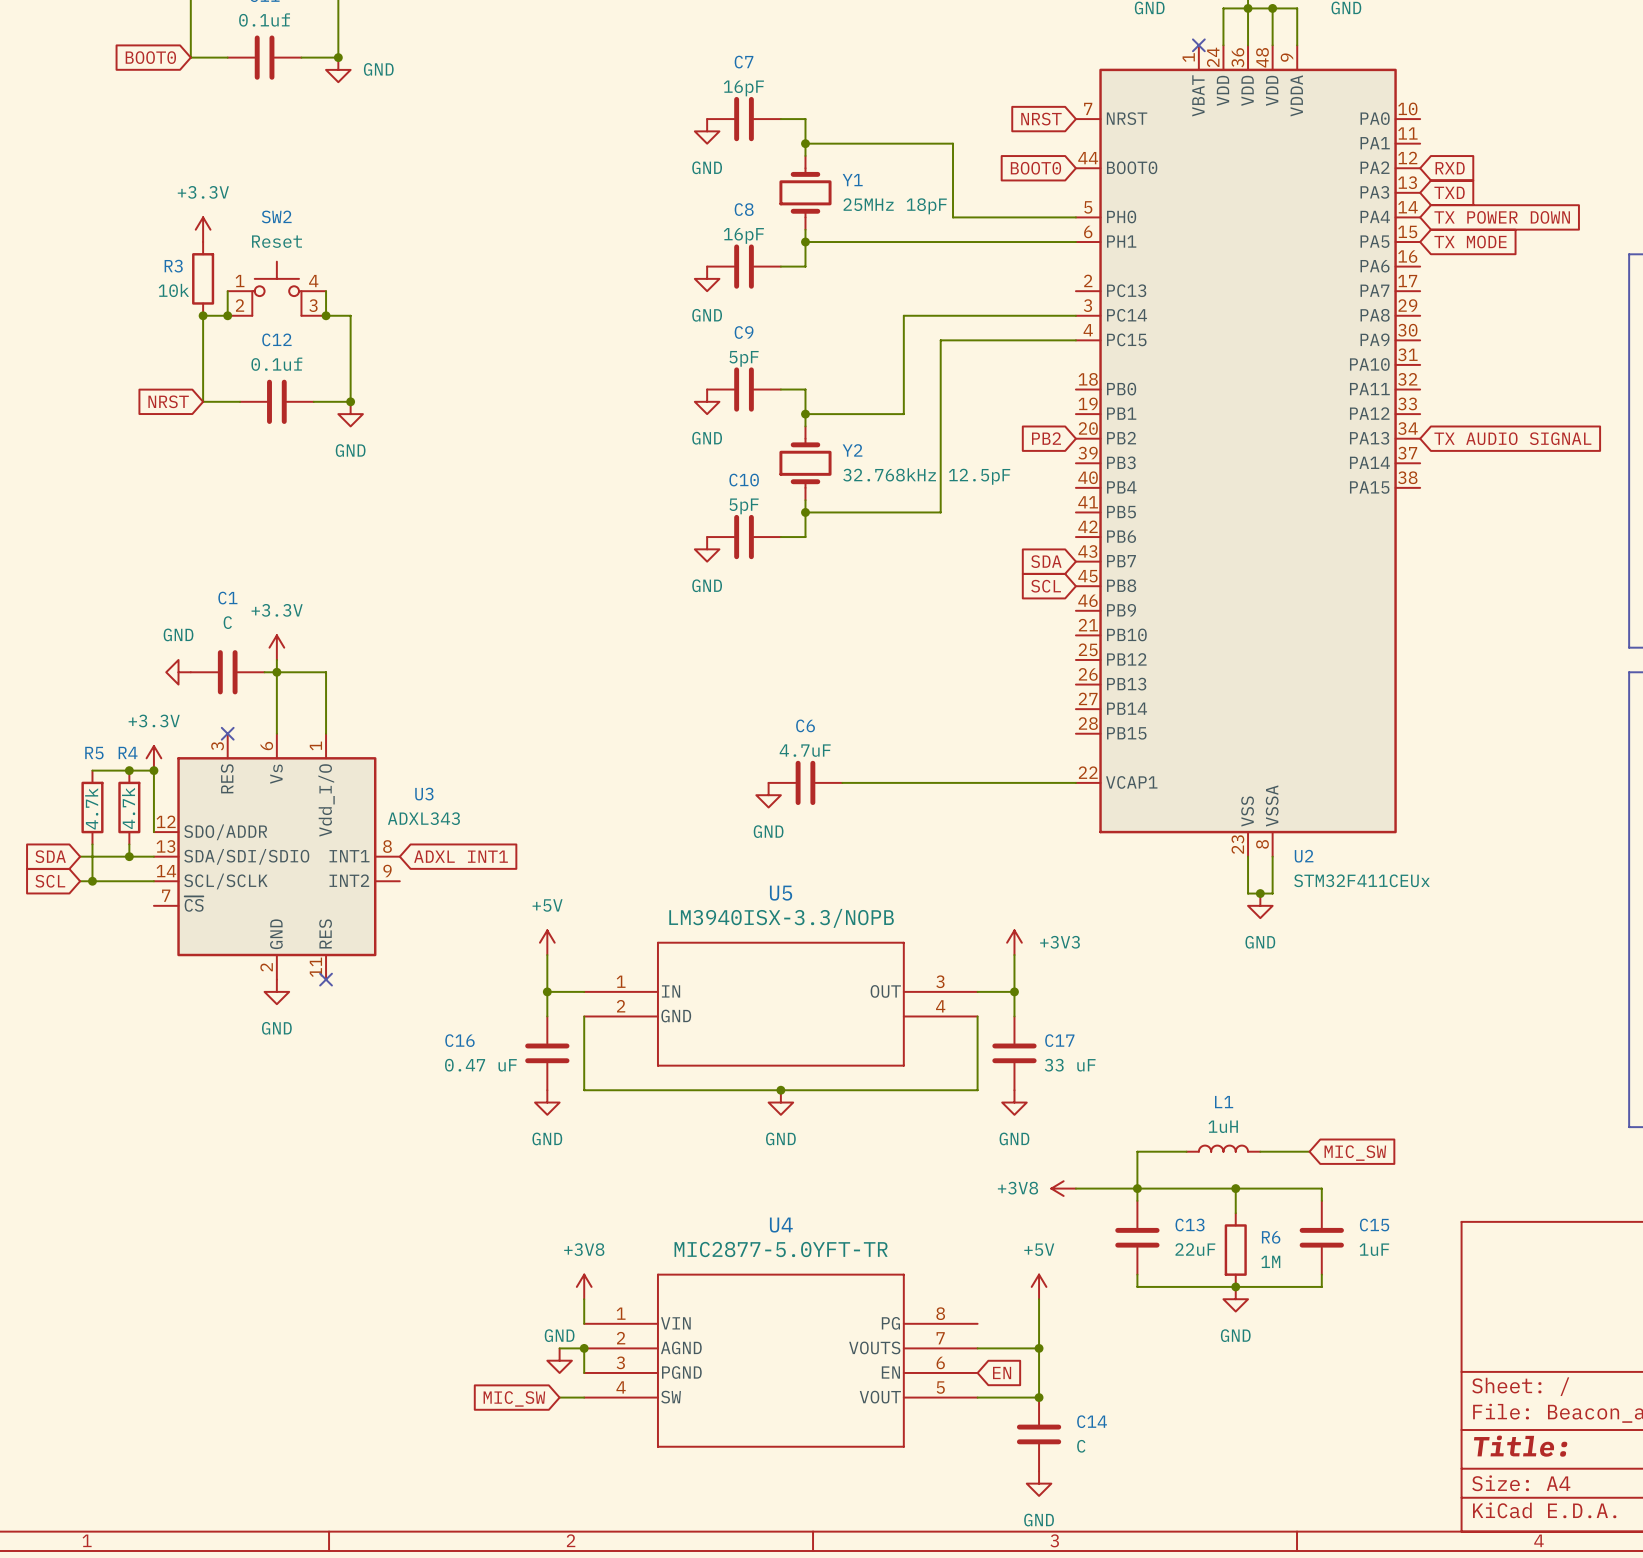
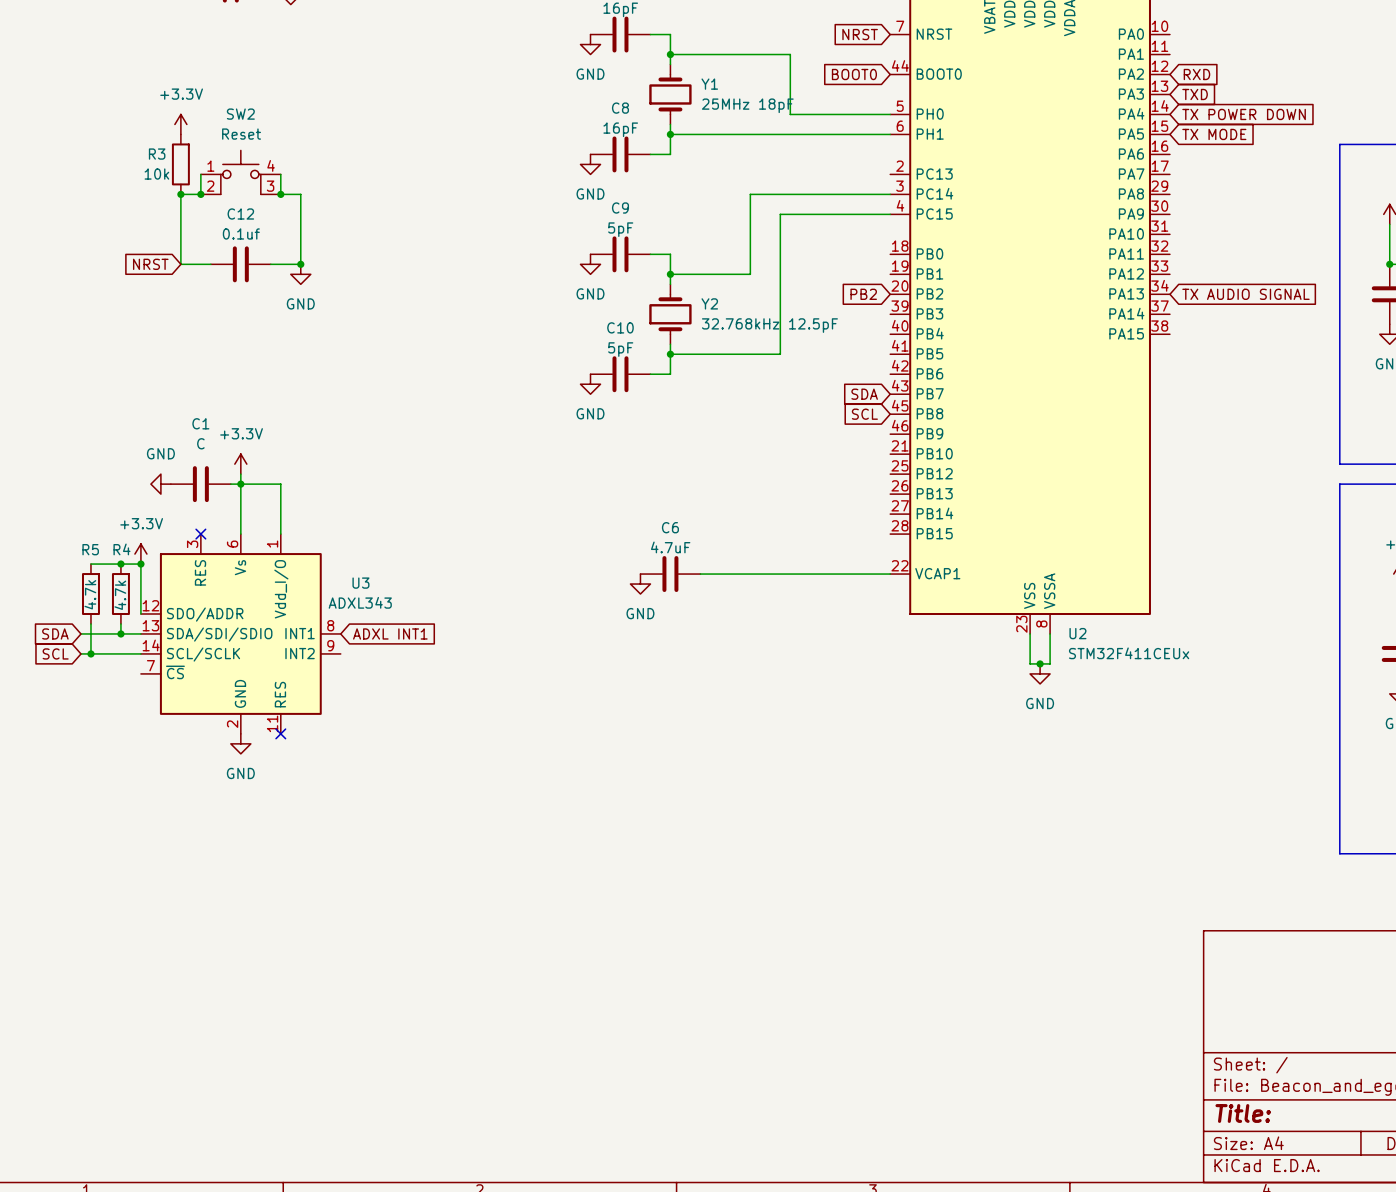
power symbol: +5V (547, 942) -> none
power symbol: +3V3 (1014, 942) -> none
wire: (547, 955) (547, 1016) -> none
wire: (1014, 955) (1014, 1016) -> none
wire: (547, 991) (584, 991) -> none
junction: (547, 991) -> none
wire: (977, 991) (1014, 991) -> none
junction: (1014, 991) -> none
U5: LM3940ISX-3.3/NOPB (780, 1004) -> none
wire: (584, 1016) (584, 1090) (977, 1090) (977, 1016) -> none
C16: 0.47 uF (547, 1053) -> none
C17: 33 uF (1014, 1053) -> none
junction: (780, 1090) -> none
power symbol: GND (547, 1102) -> none
power symbol: GND (780, 1102) -> none
power symbol: GND (1014, 1102) -> none
L1: 1uH (1223, 1148) -> none
wire: (1186, 1151) (1137, 1151) (1137, 1200) -> none
wire: (1260, 1151) (1309, 1151) -> none
global label: MIC_SW (1355, 1153) -> none
power symbol: +3V8 (1063, 1188) -> none
wire: (1075, 1188) (1321, 1188) (1321, 1200) -> none
junction: (1137, 1188) -> none
wire: (1235, 1188) (1235, 1213) -> none
junction: (1235, 1188) -> none
C13: 22uF (1137, 1237) -> none
C15: 1uF (1321, 1237) -> none
R6: 1M (1235, 1250) -> none
wire: (1137, 1274) (1137, 1286) (1321, 1286) (1321, 1274) -> none
power symbol: +3V8 (584, 1286) -> none
power symbol: +5V (1039, 1286) -> none
junction: (1235, 1286) -> none
wire: (584, 1299) (584, 1323) -> none
wire: (1039, 1299) (1039, 1397) (977, 1397) -> none
power symbol: GND (1235, 1299) -> none
wire: (559, 1348) (584, 1348) (584, 1372) -> none
junction: (584, 1348) -> none
wire: (977, 1348) (1039, 1348) -> none
junction: (1039, 1348) -> none
power symbol: GND (559, 1360) -> none
U4: MIC2877-5.0YFT-TR (780, 1360) -> none
global label: EN (1002, 1372) -> none
wire: (559, 1397) (584, 1397) -> none
junction: (1039, 1397) -> none
global label: MIC_SW (514, 1398) -> none
C14: C (1039, 1434) -> none
power symbol: GND (1039, 1483) -> none

